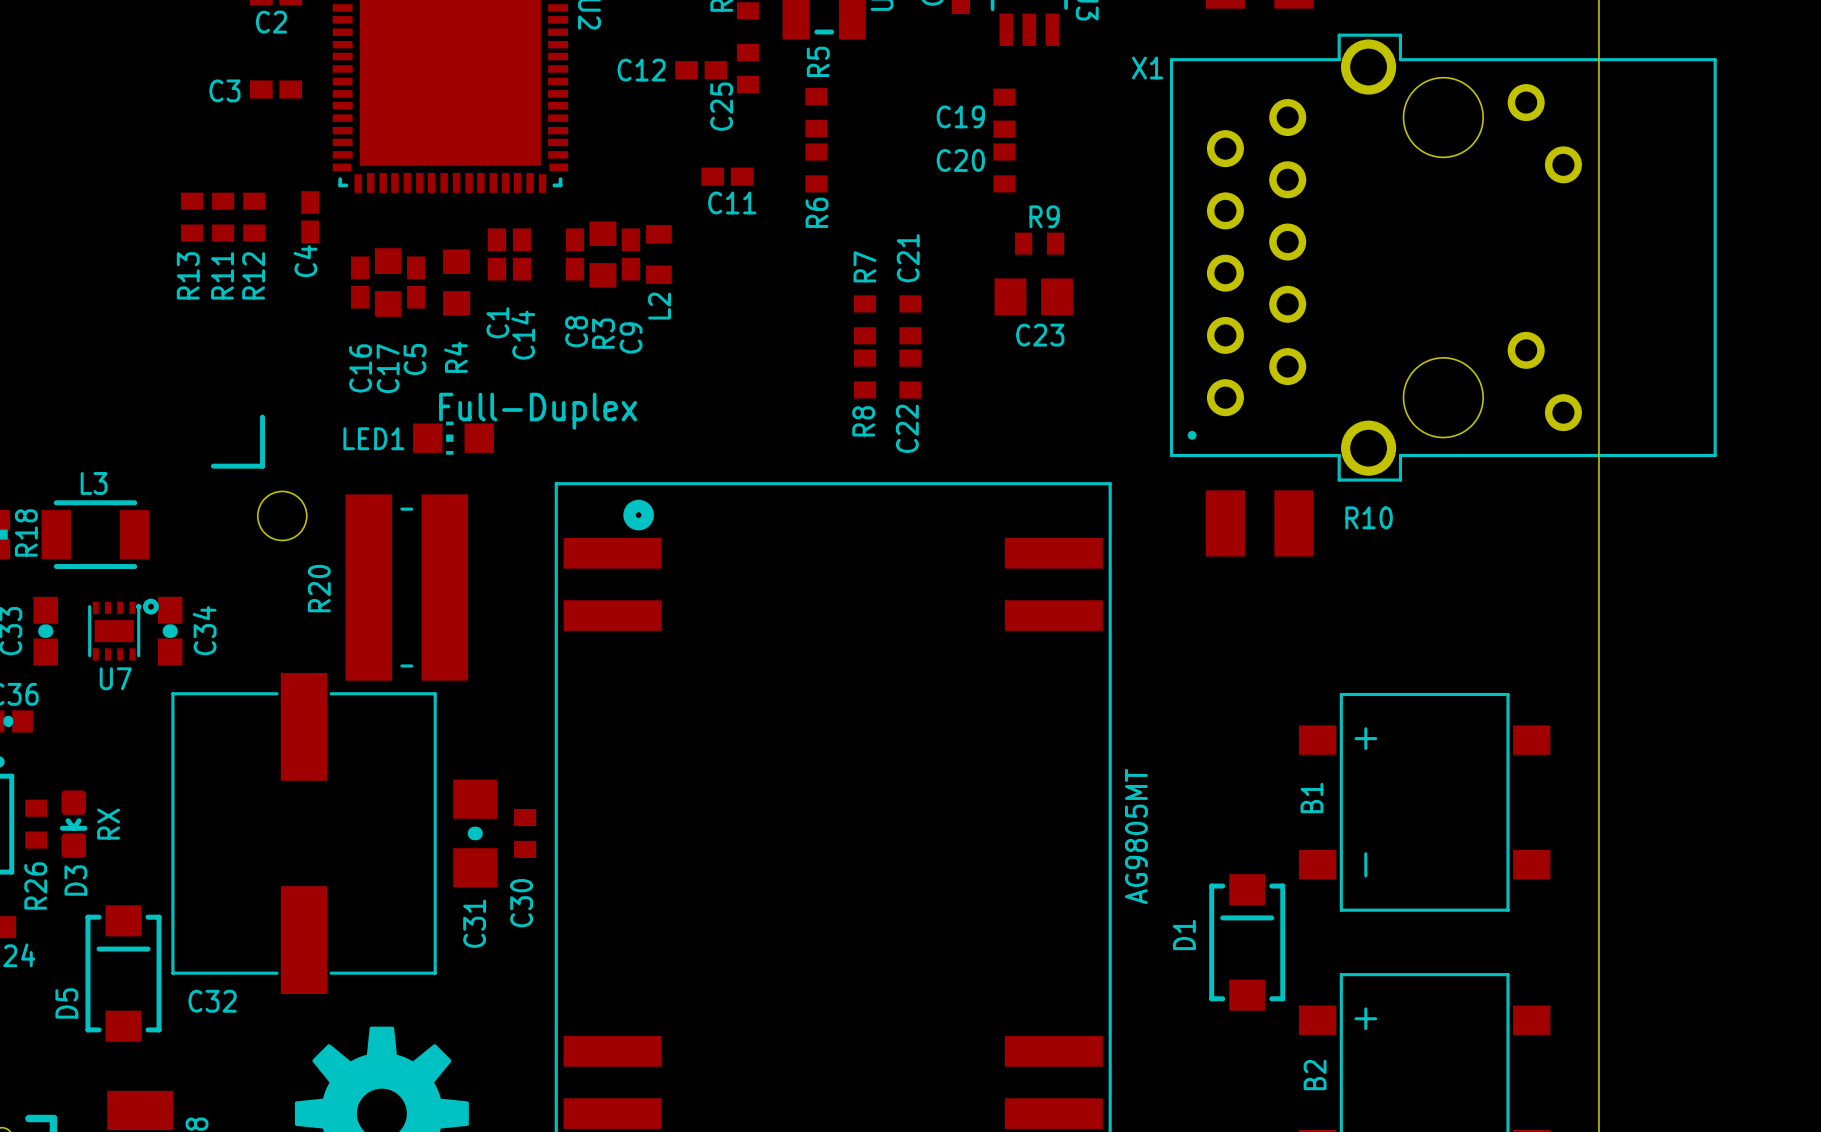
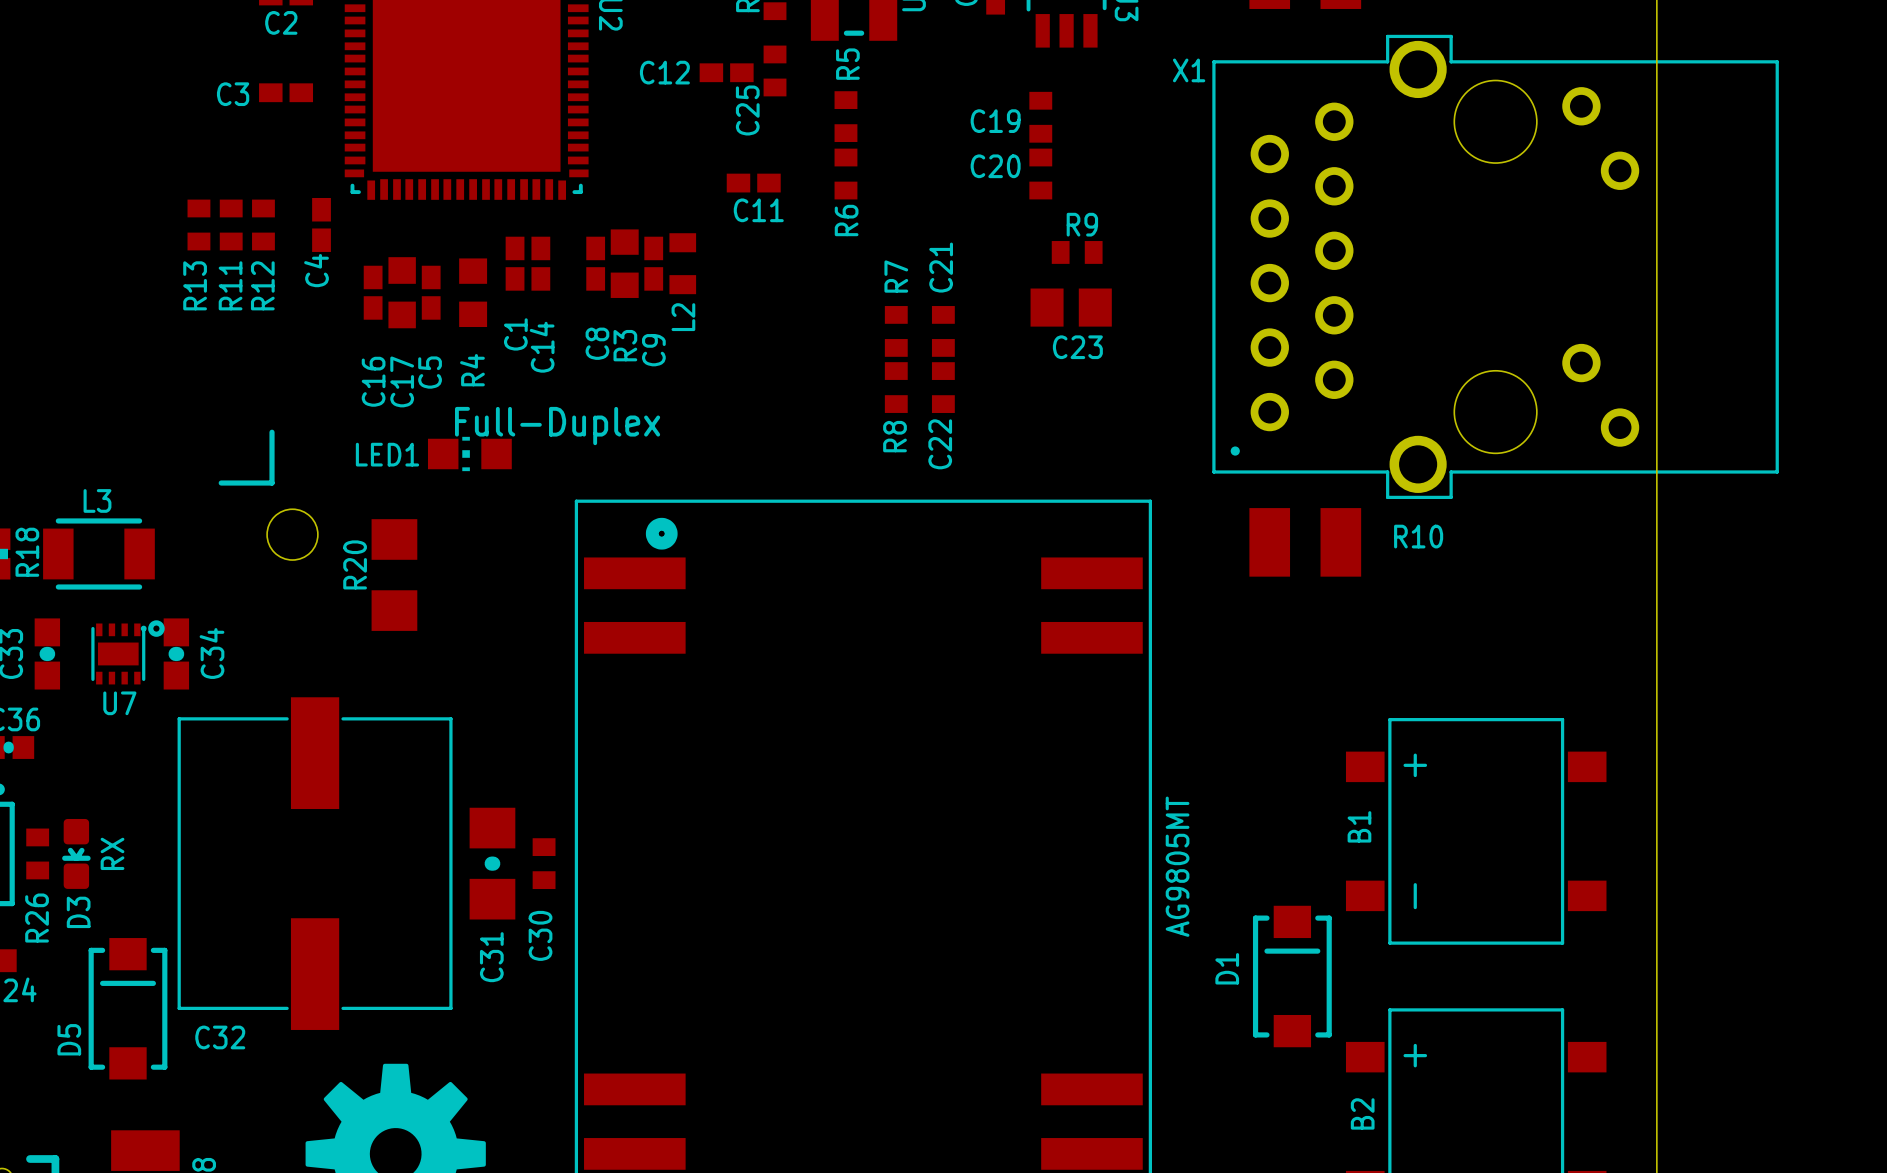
R20 footprint: [345, 494, 469, 681] -> [371, 519, 418, 631]
R20 name position: R20 (319, 588) -> R20 (355, 564)

